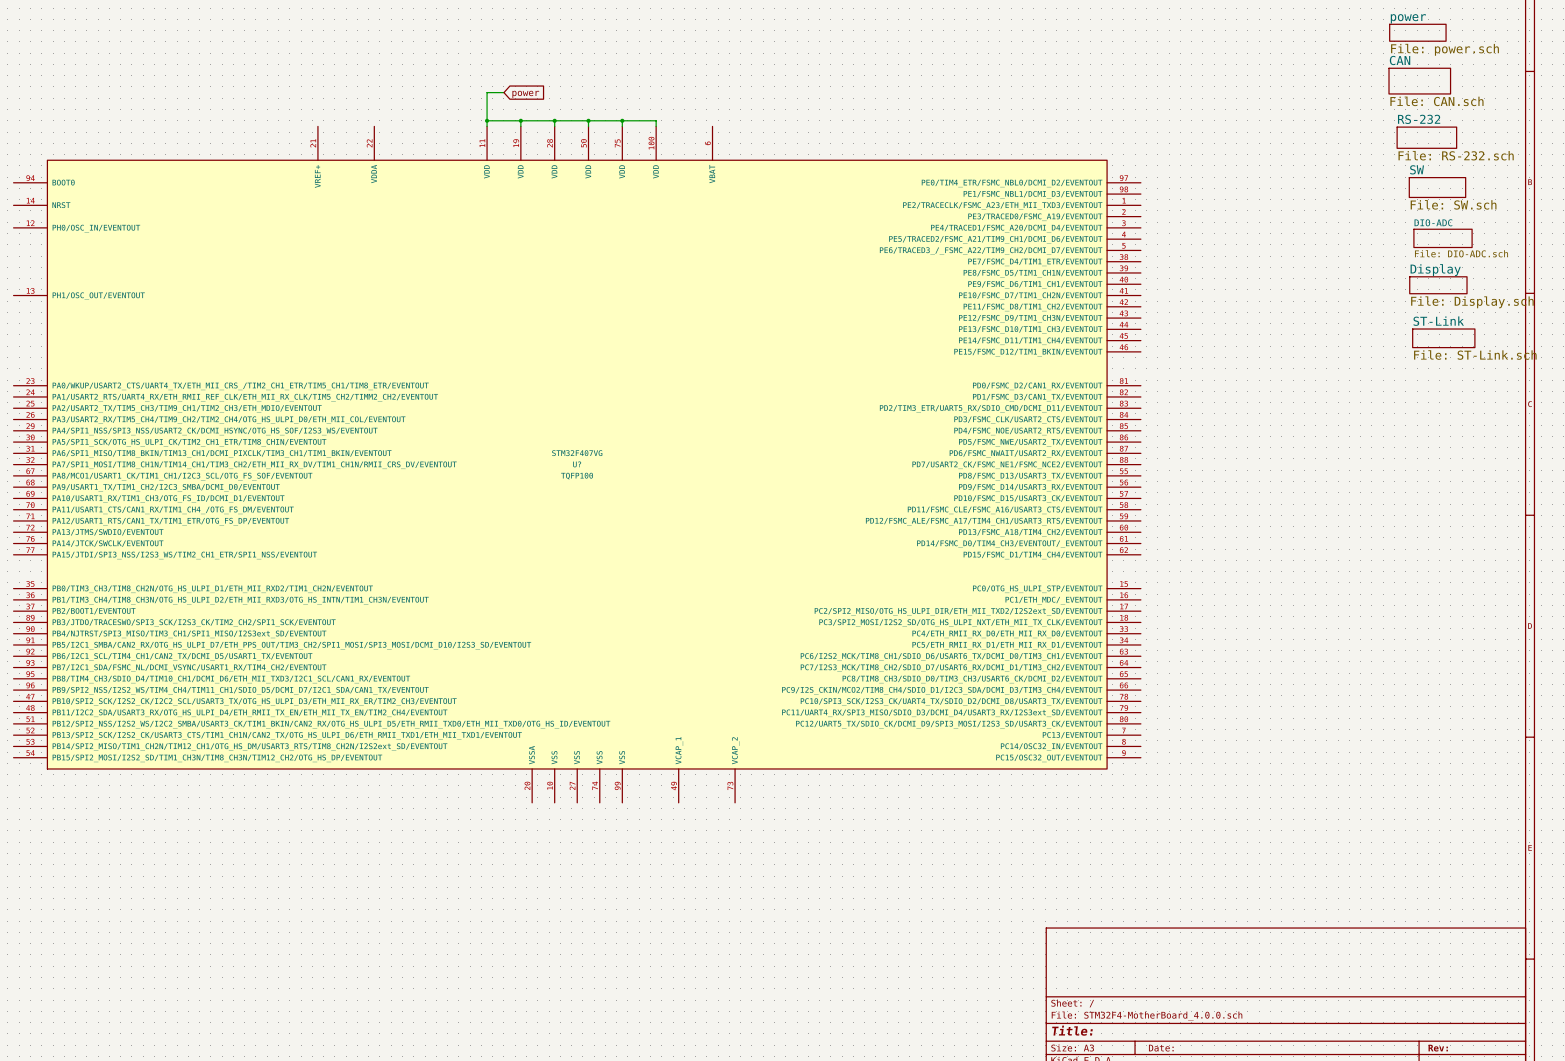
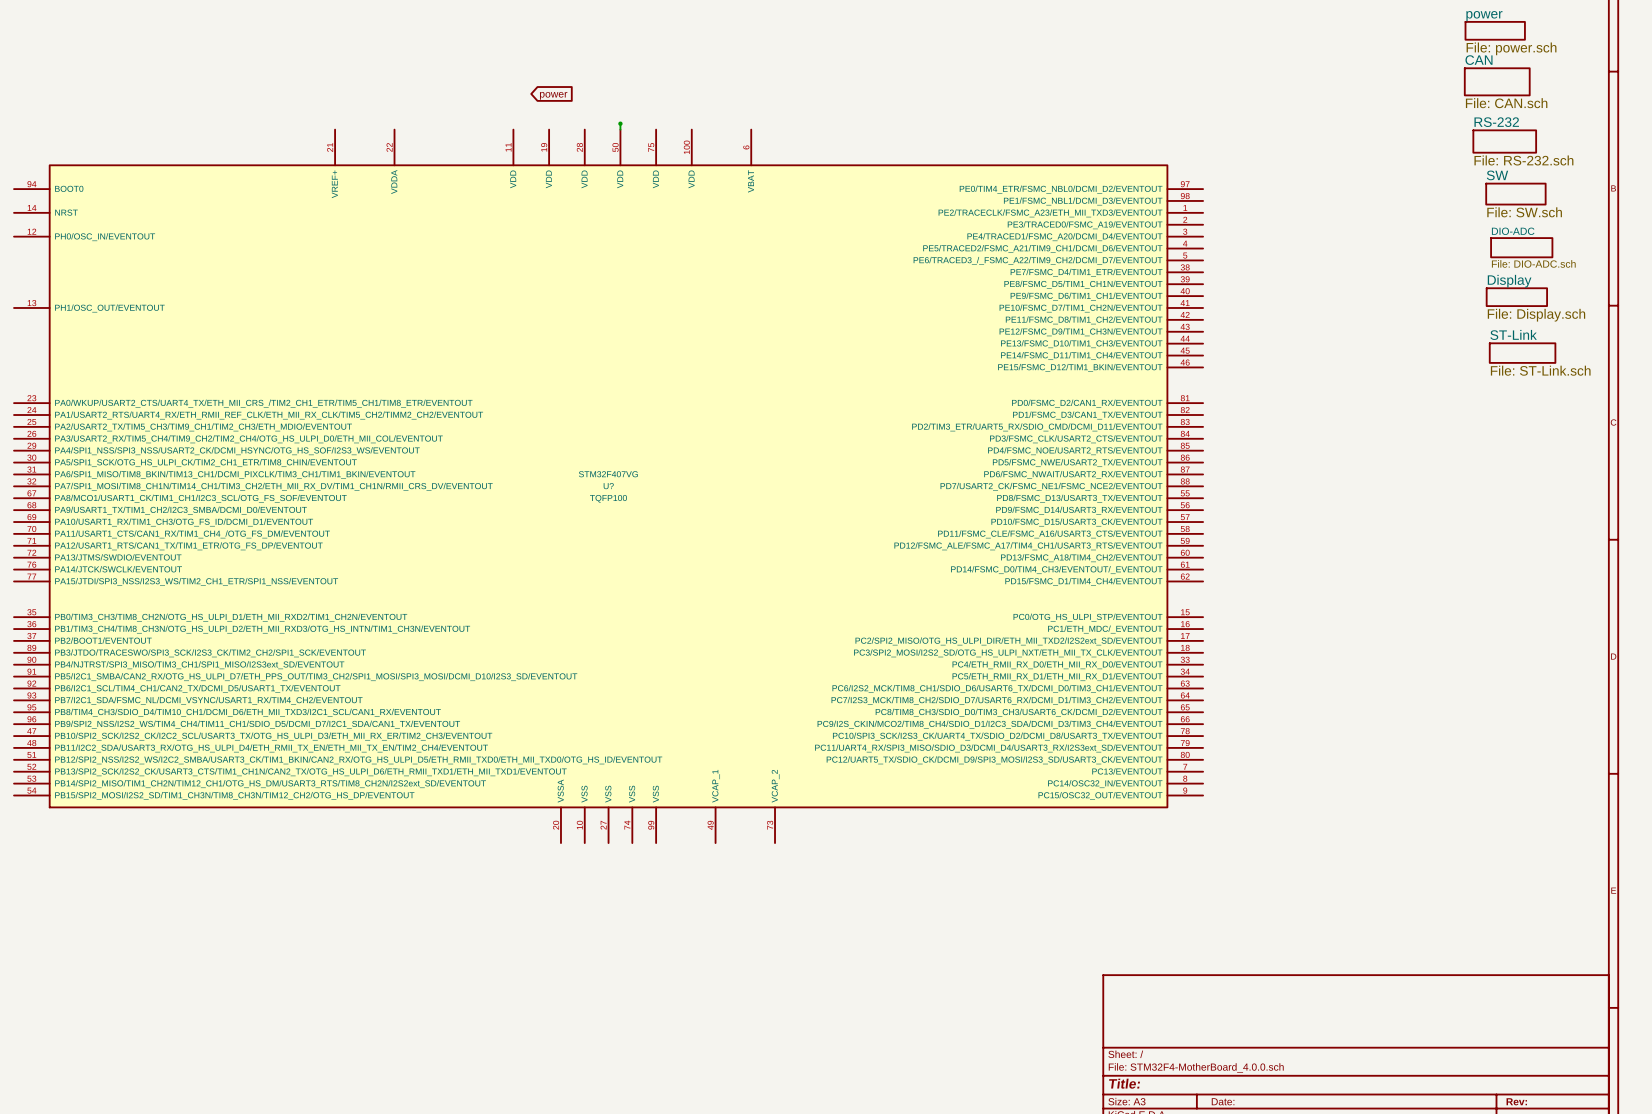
wire: (503, 92) (487, 92) (487, 126) -> none
wire: (487, 120) (656, 120) (656, 126) -> none
junction: (487, 120) -> none
wire: (520, 120) (520, 126) -> none
junction: (520, 120) -> none
wire: (554, 120) (554, 126) -> none
junction: (554, 120) -> none
wire: (622, 120) (622, 126) -> none
junction: (622, 120) -> none

